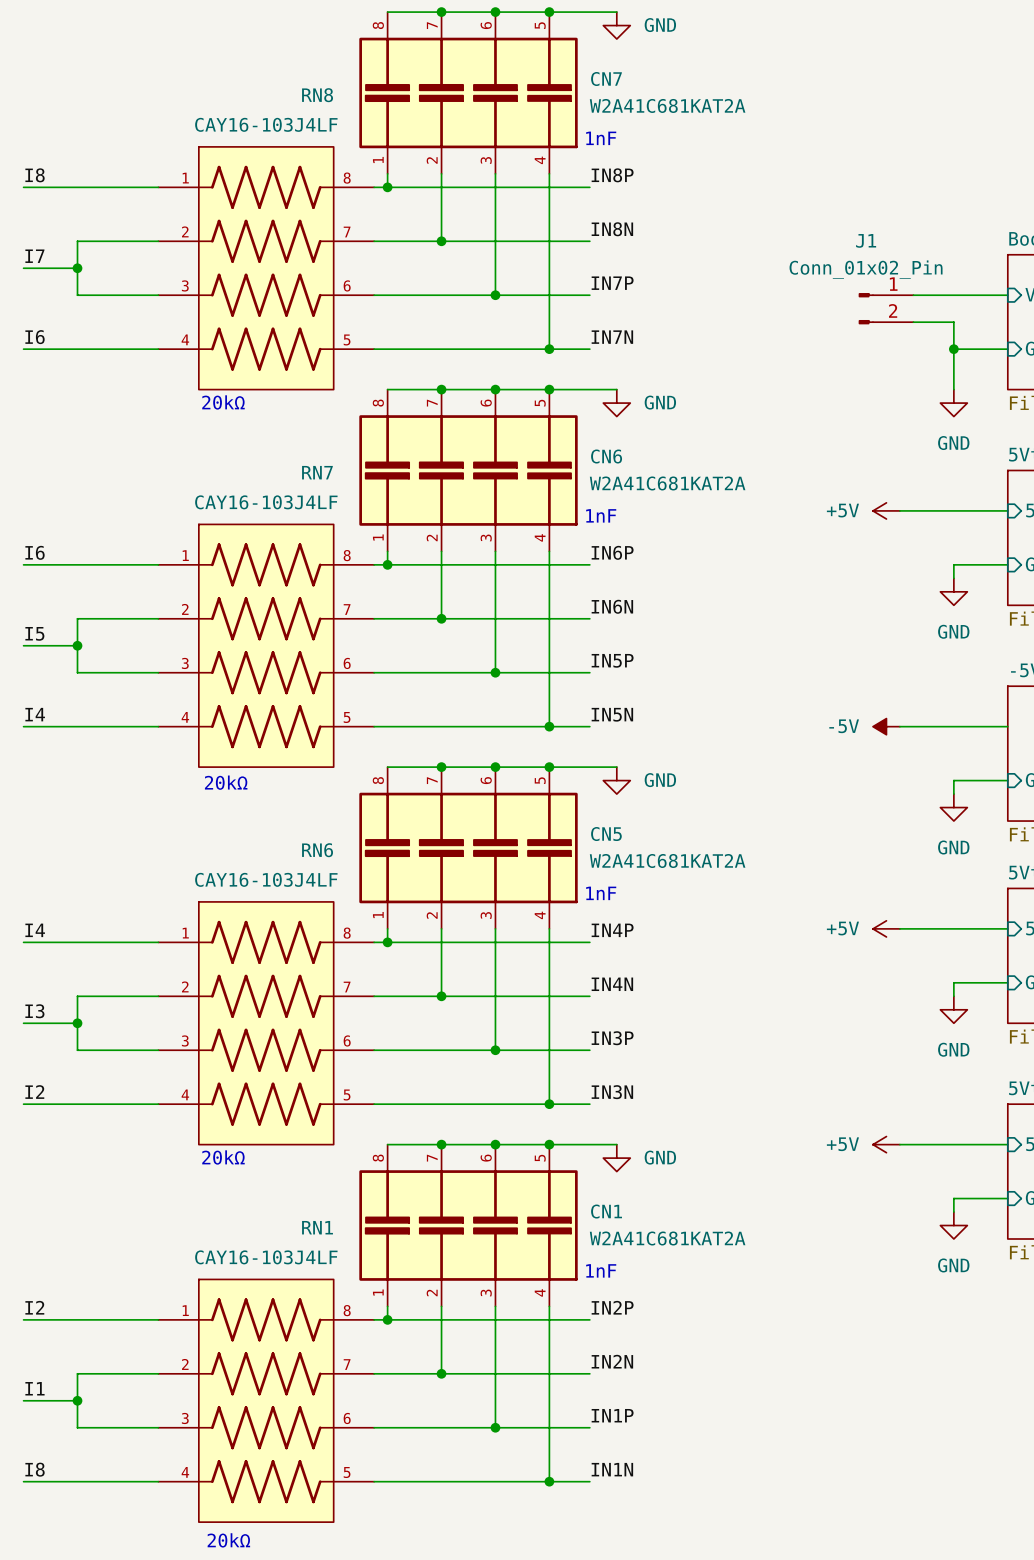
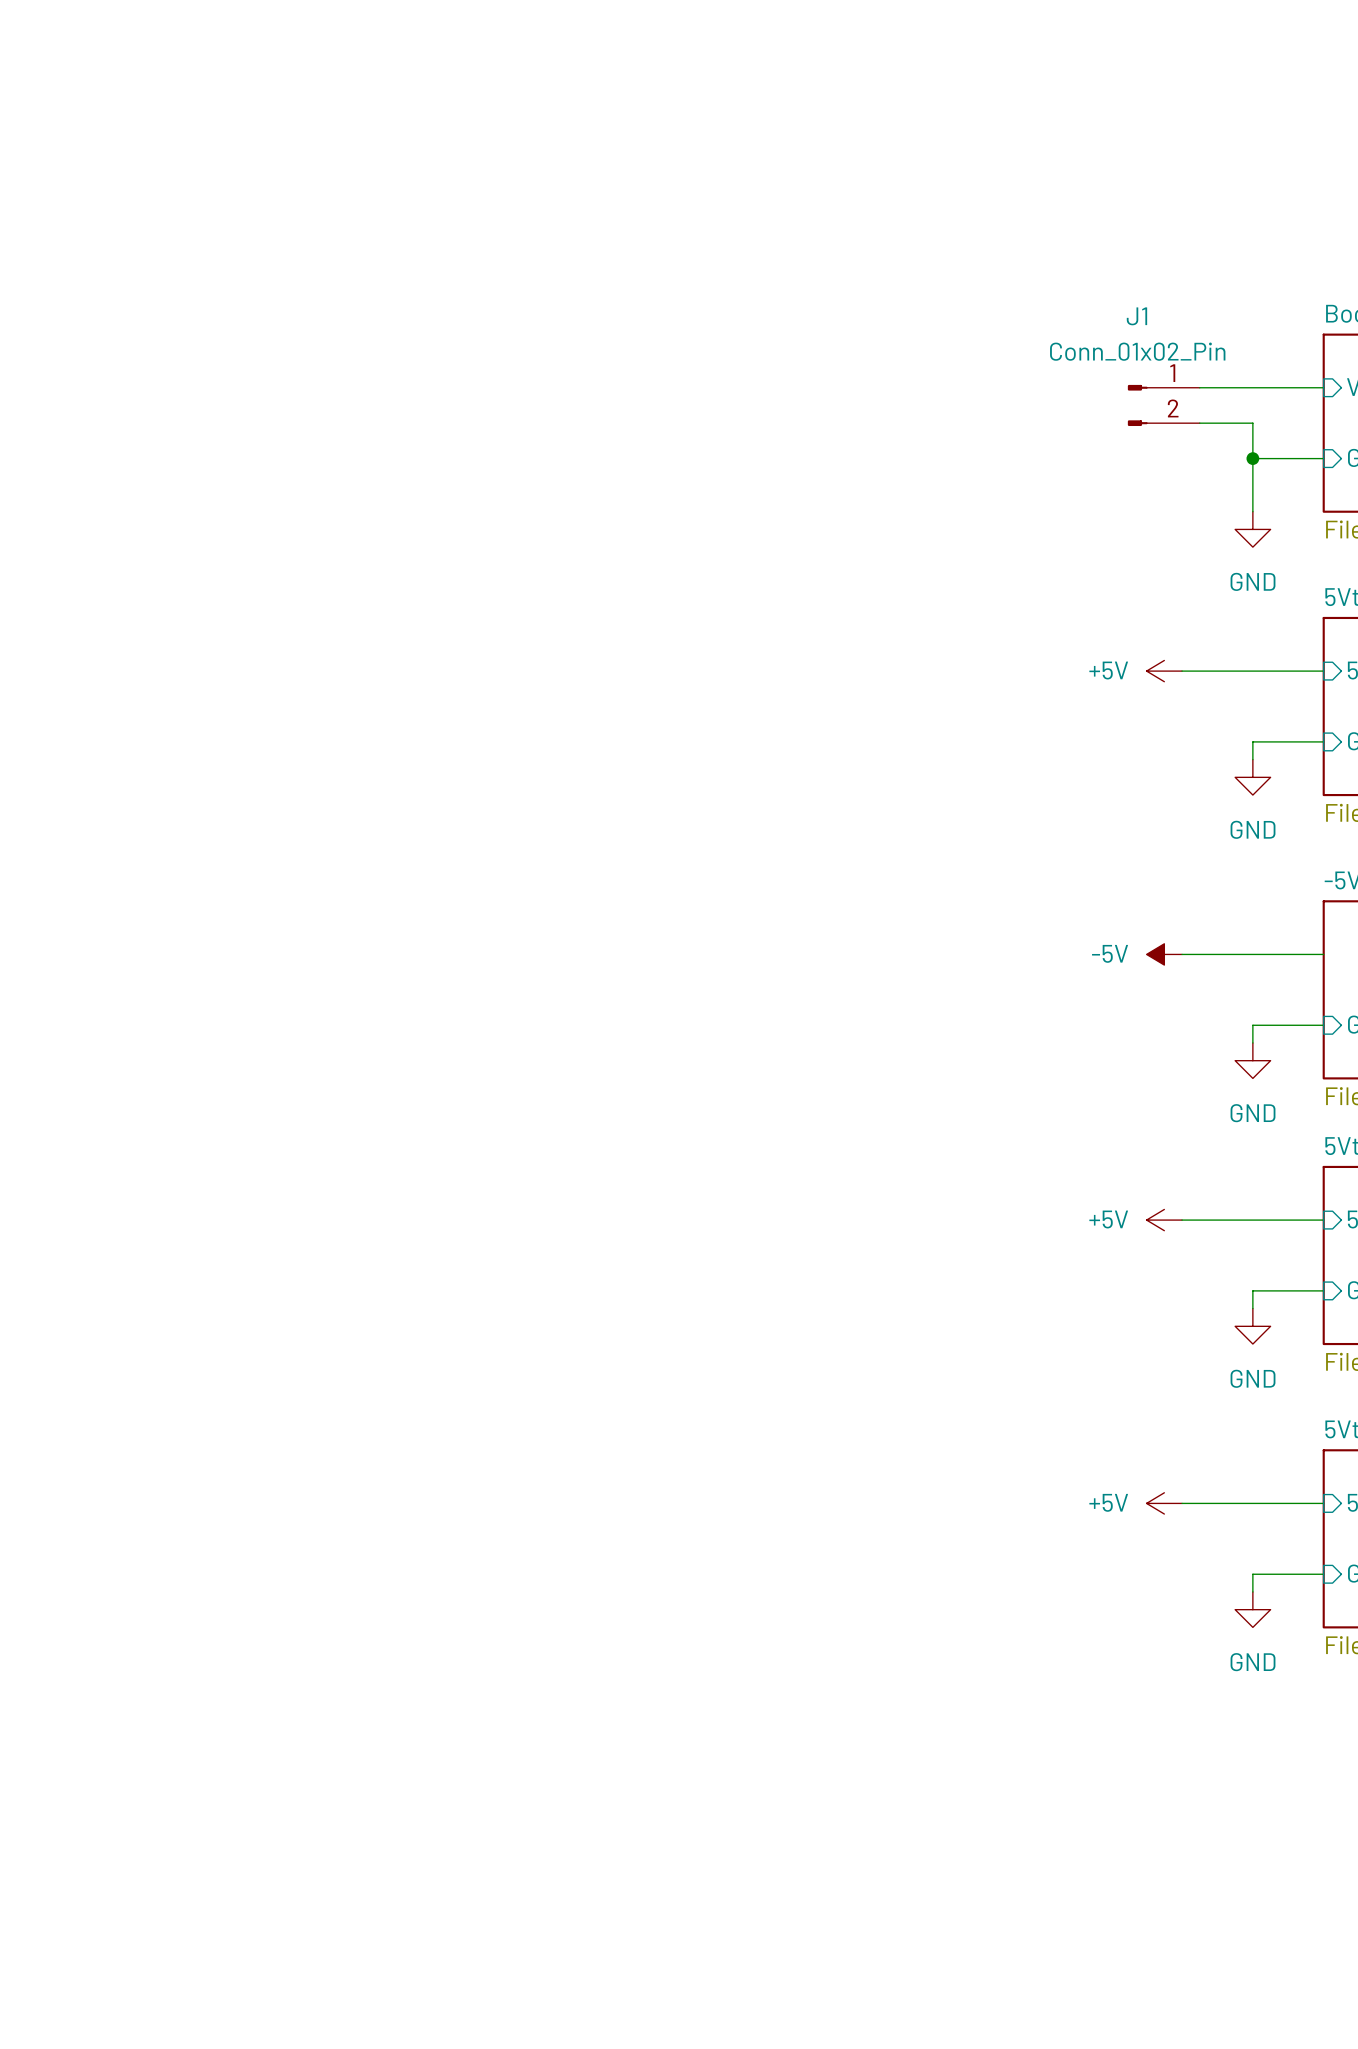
wire: (387, 12) (616, 12) -> none
junction: (441, 12) -> none
junction: (495, 12) -> none
junction: (549, 12) -> none
power symbol: GND (616, 25) -> none
CN7: W2A41C681KAT2A (468, 92) -> none
text: 1nF (601, 138) -> none
wire: (387, 173) (387, 187) -> none
wire: (441, 173) (441, 241) -> none
wire: (495, 173) (495, 295) -> none
wire: (549, 173) (549, 349) -> none
label: I8 (35, 175) -> none
label: IN8P (612, 175) -> none
wire: (23, 187) (158, 187) -> none
wire: (374, 187) (589, 187) -> none
junction: (387, 187) -> none
label: IN8N (612, 229) -> none
wire: (158, 241) (77, 241) (77, 295) (158, 295) -> none
wire: (374, 241) (589, 241) -> none
junction: (441, 241) -> none
label: I7 (34, 256) -> none
wire: (23, 268) (77, 268) -> none
junction: (77, 268) -> none
RN8: CAY16-103J4LF (266, 268) -> none
label: IN7P (612, 283) -> none
wire: (374, 295) (589, 295) -> none
junction: (495, 295) -> none
label: I6 (35, 337) -> none
label: IN7N (612, 337) -> none
wire: (23, 349) (158, 349) -> none
wire: (374, 349) (589, 349) -> none
junction: (549, 349) -> none
wire: (387, 389) (616, 389) -> none
junction: (441, 389) -> none
junction: (495, 389) -> none
junction: (549, 389) -> none
text: 20kΩ (223, 402) -> none
power symbol: GND (616, 403) -> none
CN6: W2A41C681KAT2A (468, 470) -> none
text: 1nF (601, 515) -> none
wire: (387, 551) (387, 564) -> none
wire: (441, 551) (441, 618) -> none
wire: (495, 551) (495, 672) -> none
wire: (549, 551) (549, 726) -> none
label: I6 (35, 552) -> none
label: IN6P (612, 552) -> none
wire: (23, 564) (158, 564) -> none
wire: (374, 564) (589, 564) -> none
junction: (387, 564) -> none
label: IN6N (612, 606) -> none
wire: (158, 618) (77, 618) (77, 672) (158, 672) -> none
wire: (374, 618) (589, 618) -> none
junction: (441, 618) -> none
label: I5 (34, 633) -> none
wire: (23, 645) (77, 645) -> none
junction: (77, 645) -> none
RN7: CAY16-103J4LF (266, 645) -> none
label: IN5P (612, 660) -> none
wire: (374, 672) (589, 672) -> none
junction: (495, 672) -> none
label: I4 (35, 714) -> none
label: IN5N (612, 714) -> none
wire: (23, 726) (158, 726) -> none
wire: (374, 726) (589, 726) -> none
junction: (549, 726) -> none
wire: (387, 767) (616, 767) -> none
junction: (441, 767) -> none
junction: (495, 767) -> none
junction: (549, 767) -> none
power symbol: GND (616, 780) -> none
text: 20kΩ (226, 782) -> none
CN5: W2A41C681KAT2A (468, 848) -> none
text: 1nF (601, 893) -> none
wire: (387, 928) (387, 942) -> none
wire: (441, 928) (441, 996) -> none
wire: (495, 928) (495, 1050) -> none
wire: (549, 928) (549, 1104) -> none
label: I4 (35, 930) -> none
label: IN4P (612, 930) -> none
wire: (23, 942) (158, 942) -> none
wire: (374, 942) (589, 942) -> none
junction: (387, 942) -> none
label: IN4N (612, 984) -> none
wire: (158, 996) (77, 996) (77, 1050) (158, 1050) -> none
wire: (374, 996) (589, 996) -> none
junction: (441, 996) -> none
label: I3 (34, 1011) -> none
wire: (23, 1023) (77, 1023) -> none
junction: (77, 1023) -> none
RN6: CAY16-103J4LF (266, 1023) -> none
label: IN3P (612, 1038) -> none
wire: (374, 1050) (589, 1050) -> none
junction: (495, 1050) -> none
label: I2 (34, 1092) -> none
label: IN3N (612, 1092) -> none
wire: (23, 1104) (158, 1104) -> none
wire: (374, 1104) (589, 1104) -> none
junction: (549, 1104) -> none
wire: (387, 1144) (616, 1144) -> none
junction: (441, 1144) -> none
junction: (495, 1144) -> none
junction: (549, 1144) -> none
text: 20kΩ (223, 1157) -> none
power symbol: GND (616, 1158) -> none
CN1: W2A41C681KAT2A (468, 1225) -> none
text: 1nF (601, 1270) -> none
wire: (387, 1306) (387, 1319) -> none
wire: (441, 1306) (441, 1373) -> none
wire: (495, 1306) (495, 1427) -> none
wire: (549, 1306) (549, 1481) -> none
label: I2 (34, 1307) -> none
label: IN2P (612, 1307) -> none
wire: (23, 1319) (158, 1319) -> none
wire: (374, 1319) (589, 1319) -> none
junction: (387, 1319) -> none
label: IN2N (612, 1361) -> none
wire: (158, 1373) (77, 1373) (77, 1427) (158, 1427) -> none
wire: (374, 1373) (589, 1373) -> none
junction: (441, 1373) -> none
label: I1 (34, 1388) -> none
wire: (23, 1400) (77, 1400) -> none
junction: (77, 1400) -> none
RN1: CAY16-103J4LF (266, 1400) -> none
label: IN1P (612, 1415) -> none
wire: (374, 1427) (589, 1427) -> none
junction: (495, 1427) -> none
label: I8 (35, 1469) -> none
label: IN1N (612, 1469) -> none
wire: (23, 1481) (158, 1481) -> none
wire: (374, 1481) (589, 1481) -> none
junction: (549, 1481) -> none
text: 20kΩ (228, 1540) -> none

